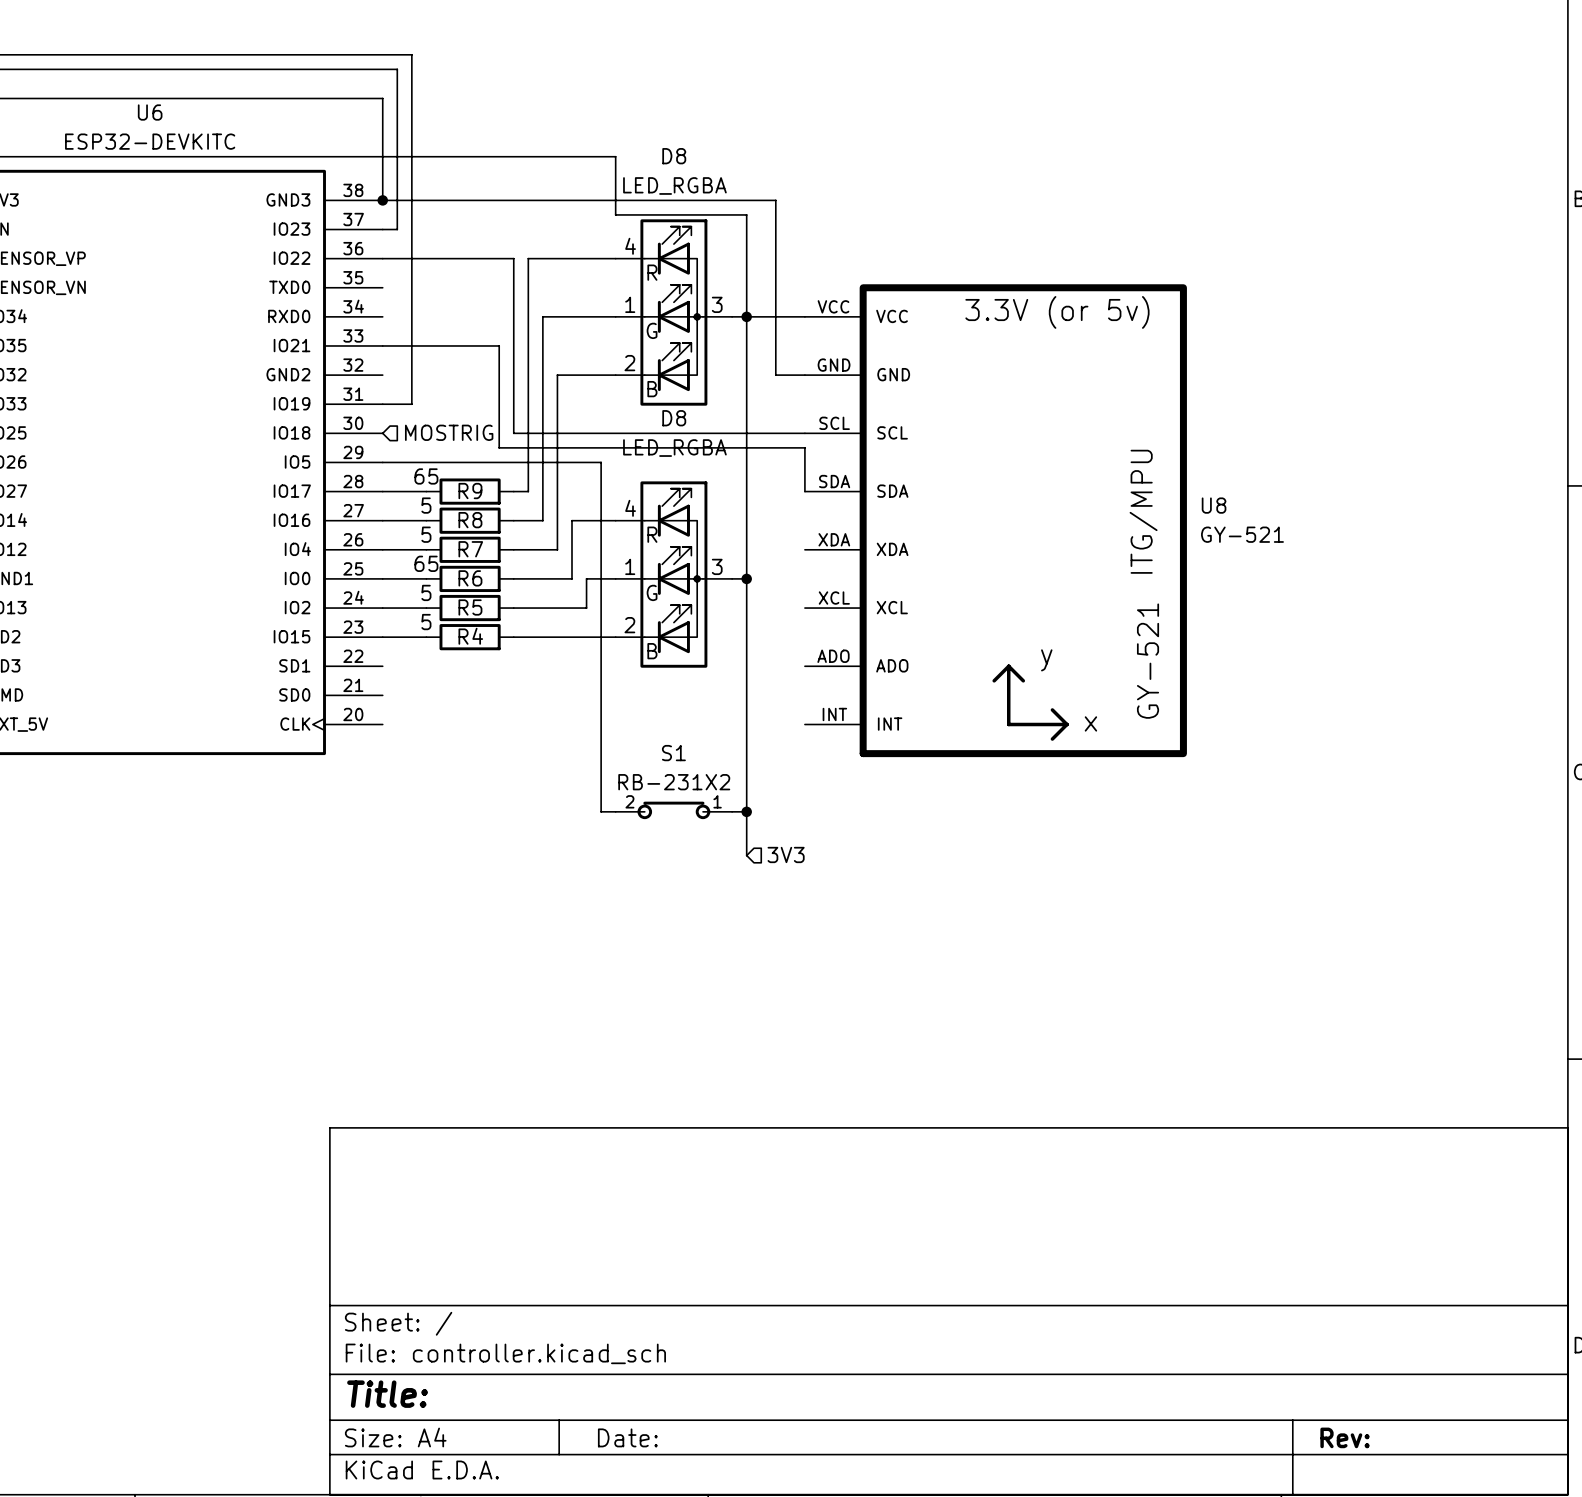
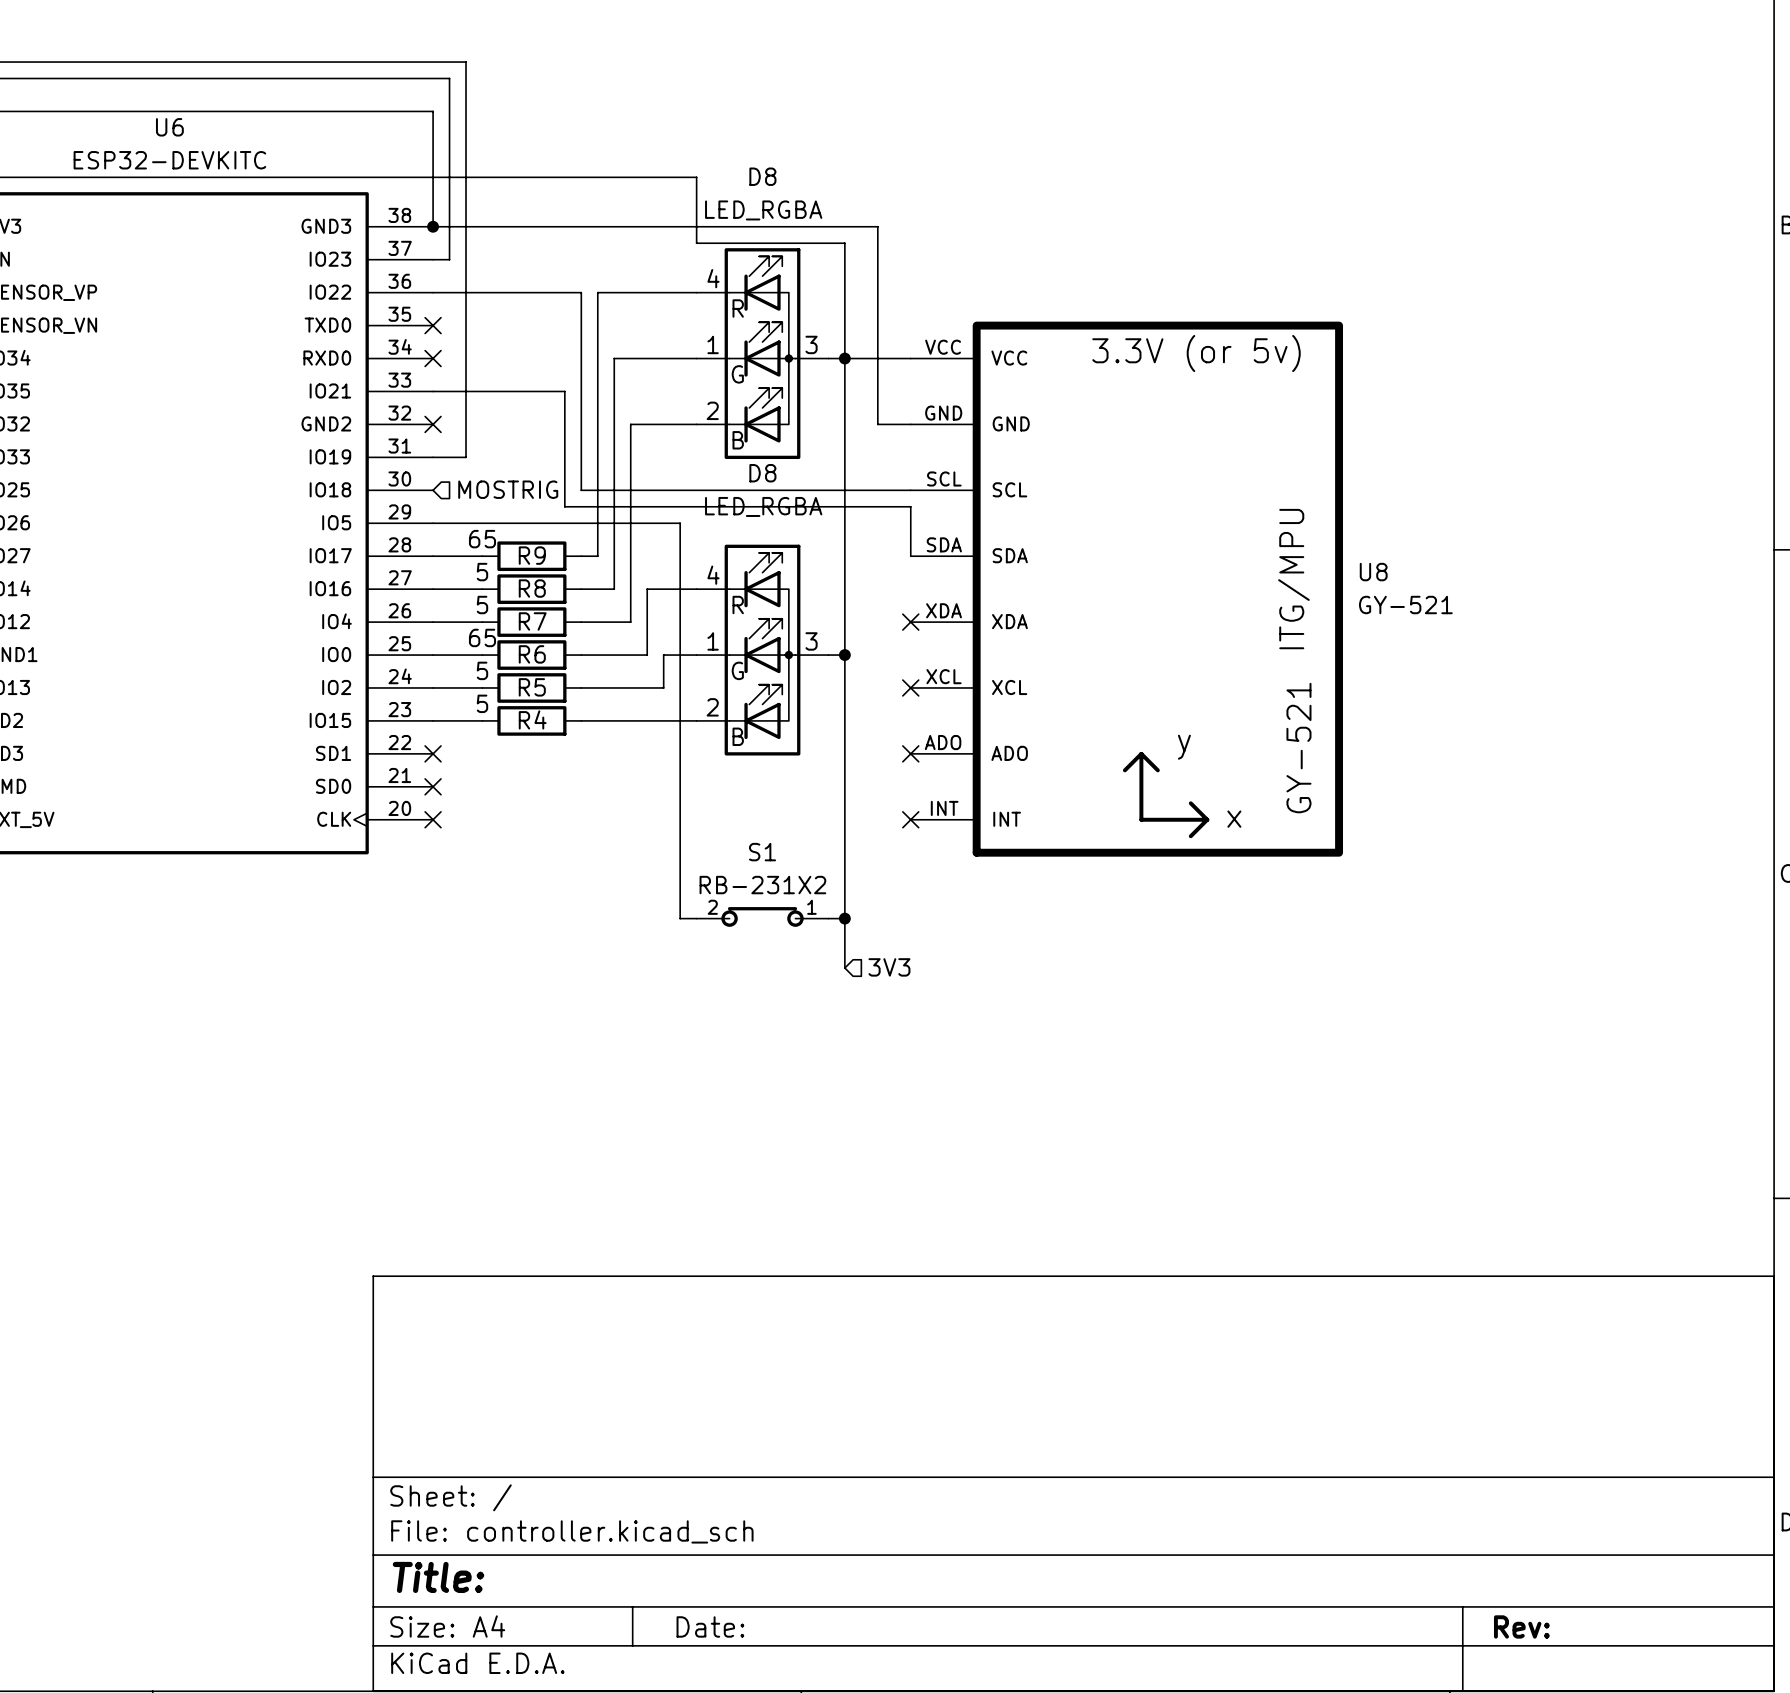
no-connect mark: none -> (433, 325)
no-connect mark: none -> (433, 358)
no-connect mark: none -> (433, 424)
no-connect mark: none -> (910, 622)
no-connect mark: none -> (910, 687)
no-connect mark: none -> (433, 753)
no-connect mark: none -> (910, 753)
no-connect mark: none -> (433, 786)
no-connect mark: none -> (433, 819)
no-connect mark: none -> (910, 819)

